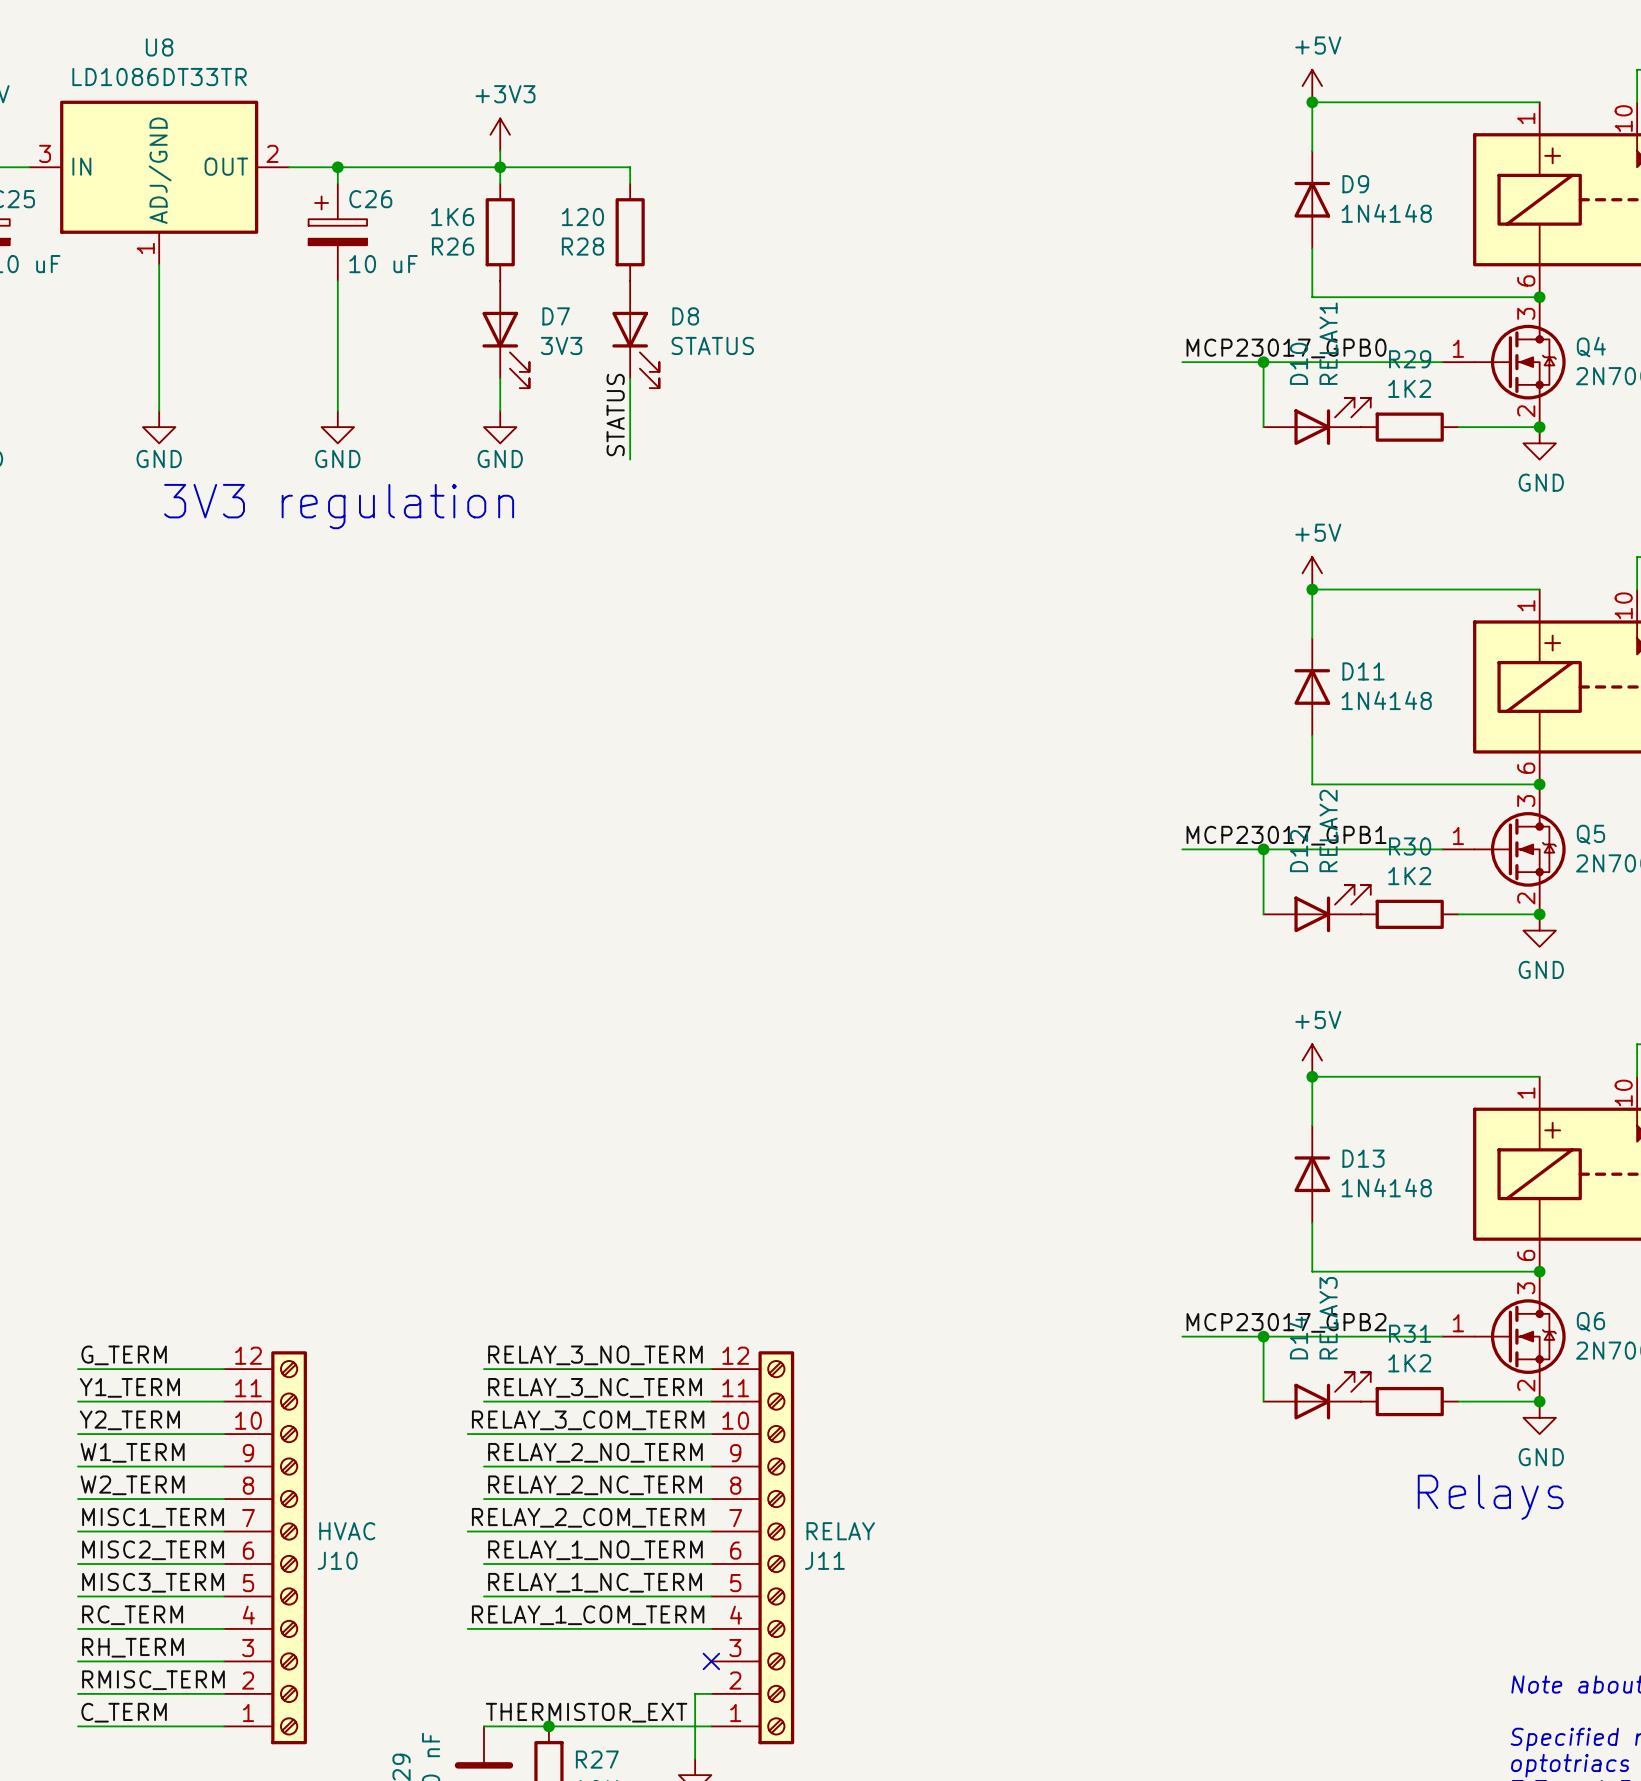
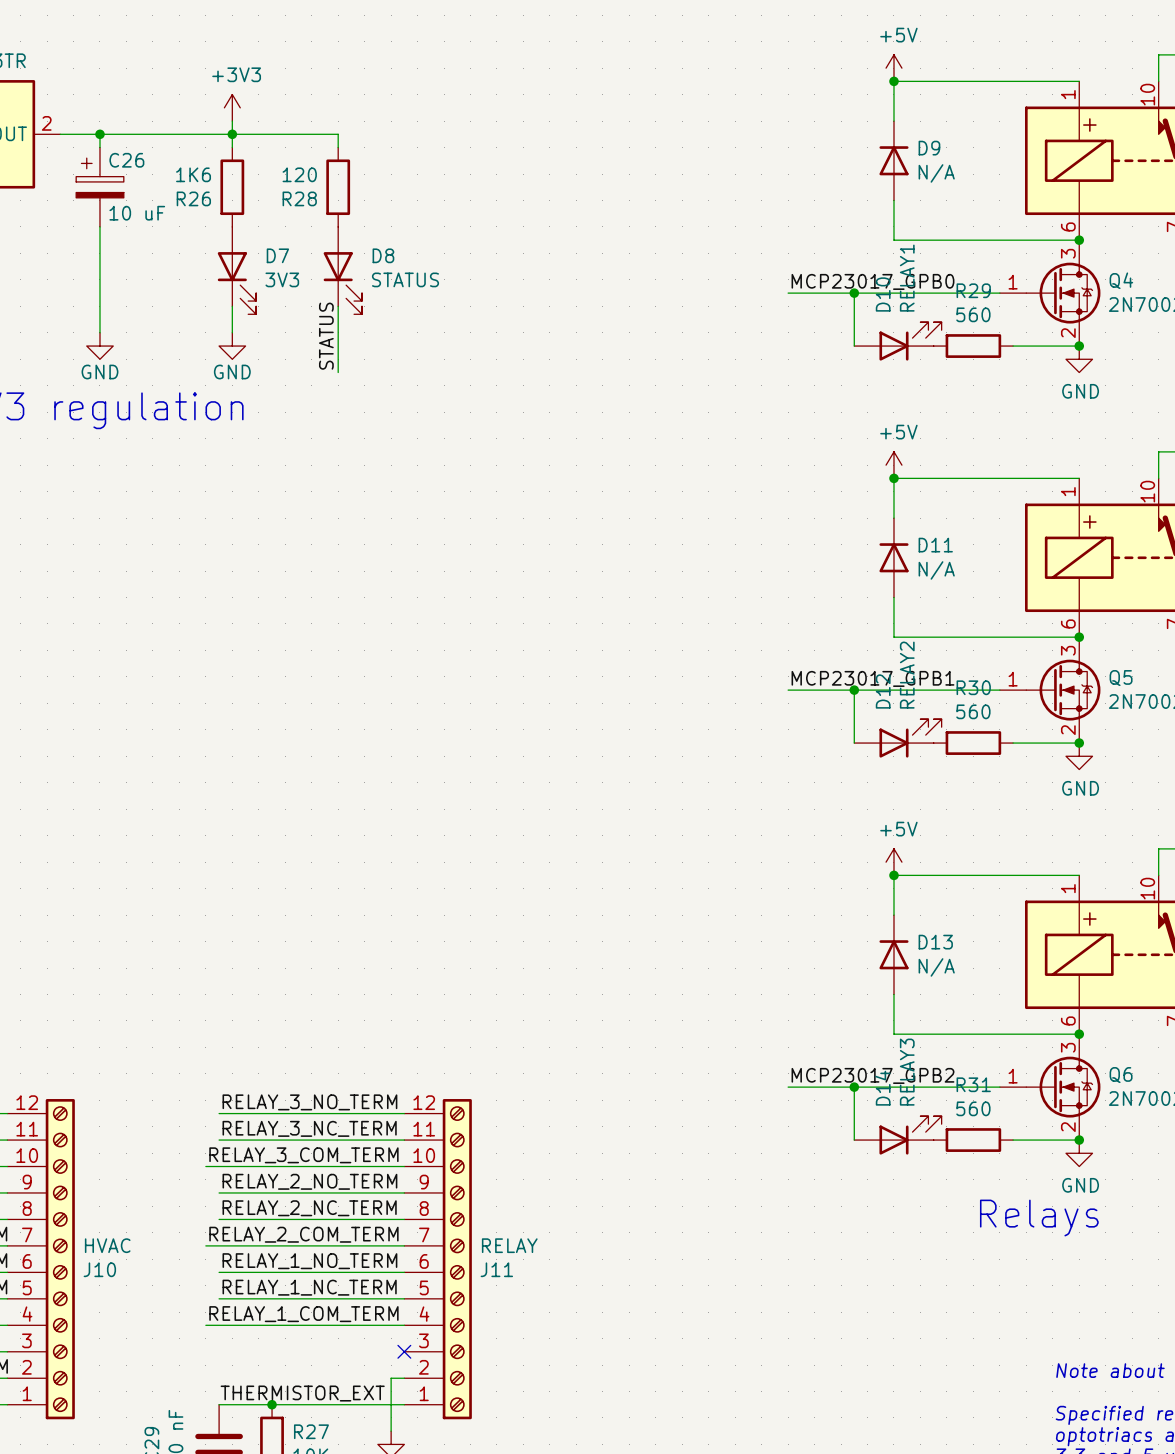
D9 value: 1N4148 (1386, 213) -> N/A (936, 173)
R29 value: 1K2 (1409, 388) -> 560 (973, 314)
D11 value: 1N4148 (1386, 700) -> N/A (936, 570)
R30 value: 1K2 (1409, 876) -> 560 (973, 711)
D13 value: 1N4148 (1386, 1187) -> N/A (936, 967)
R31 value: 1K2 (1409, 1363) -> 560 (973, 1108)

